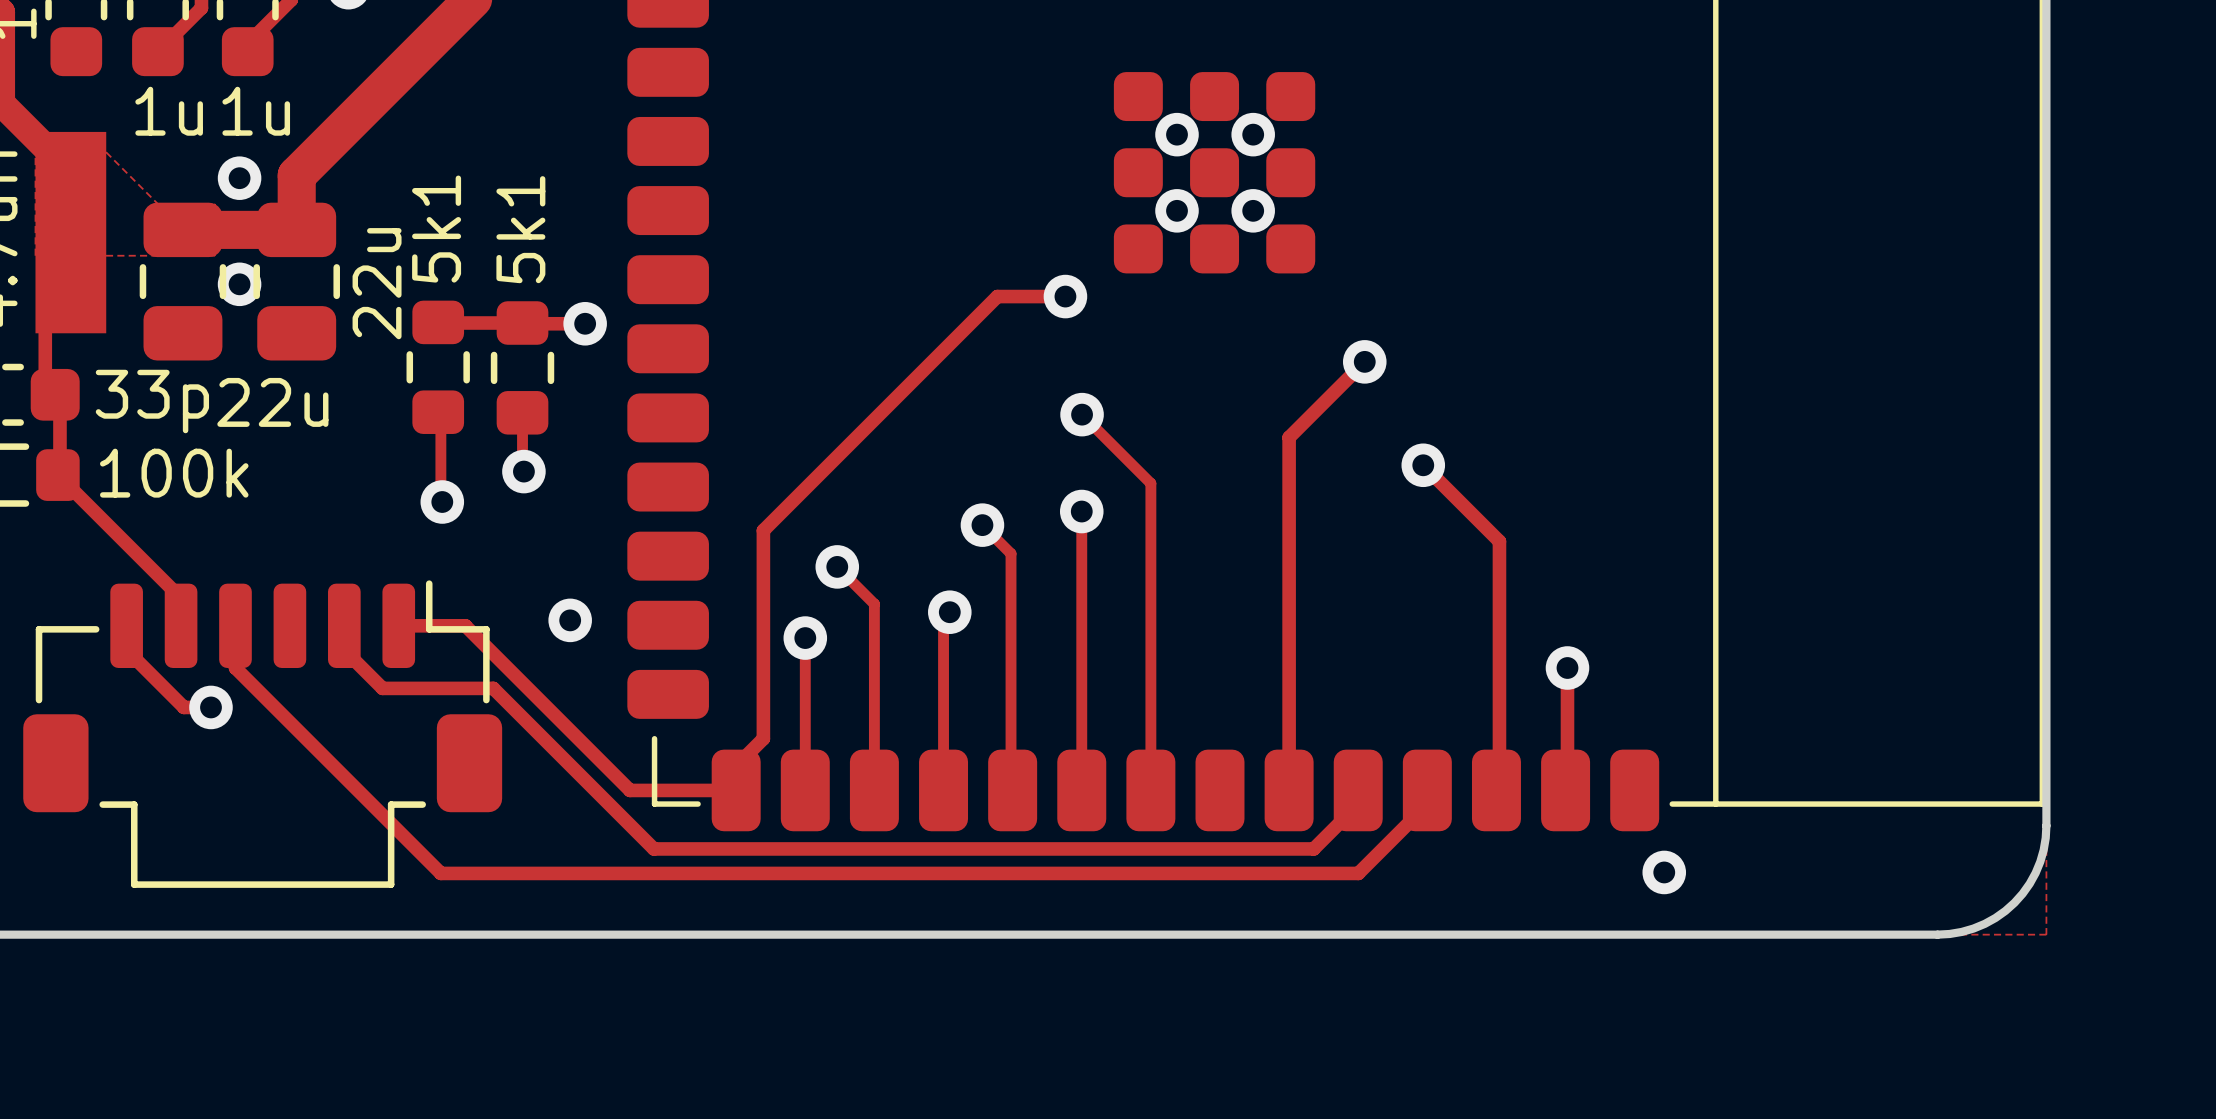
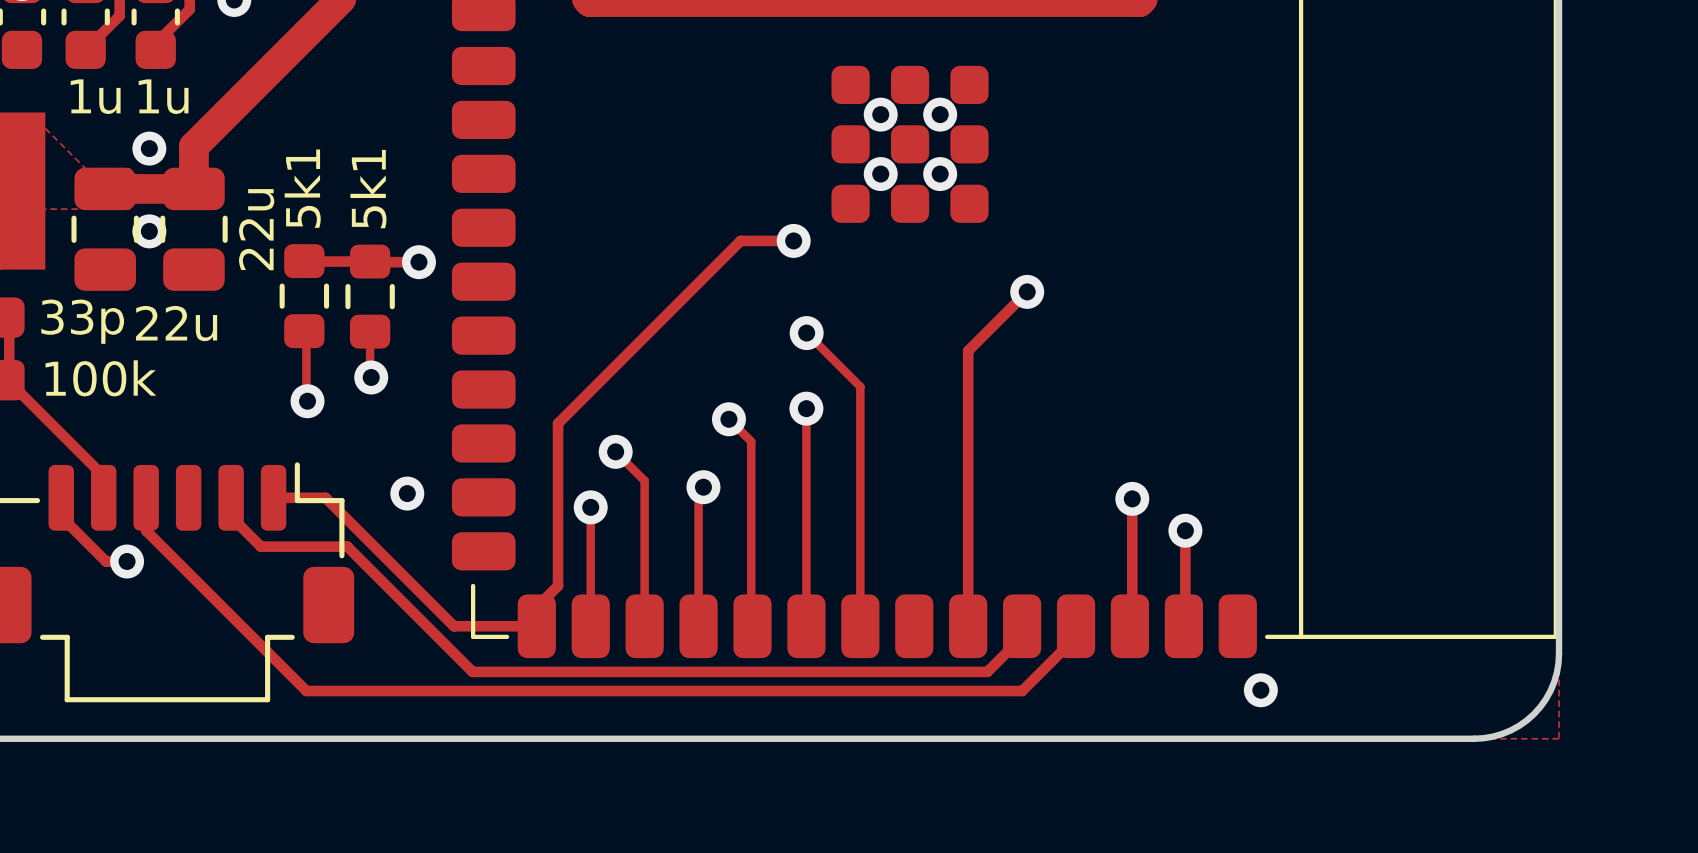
track: (1423, 465) (1499, 541) (1499, 627) -> none
via position: (1423, 465) -> (1132, 498)

